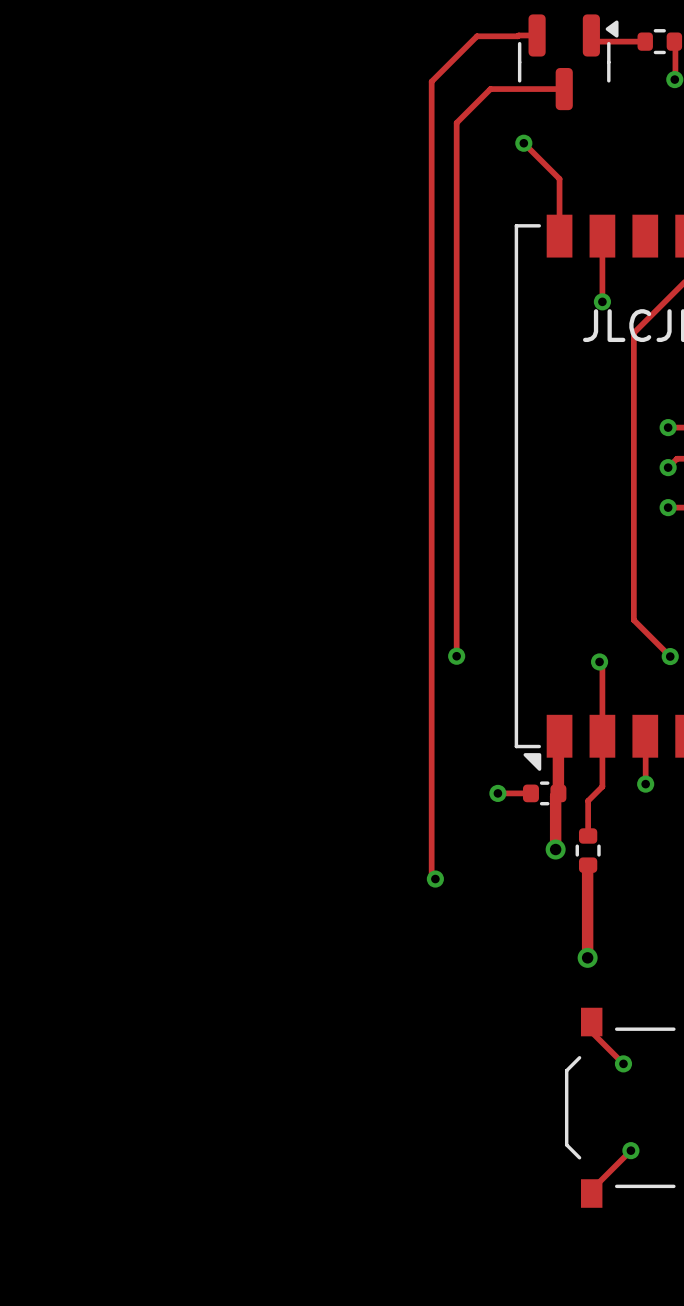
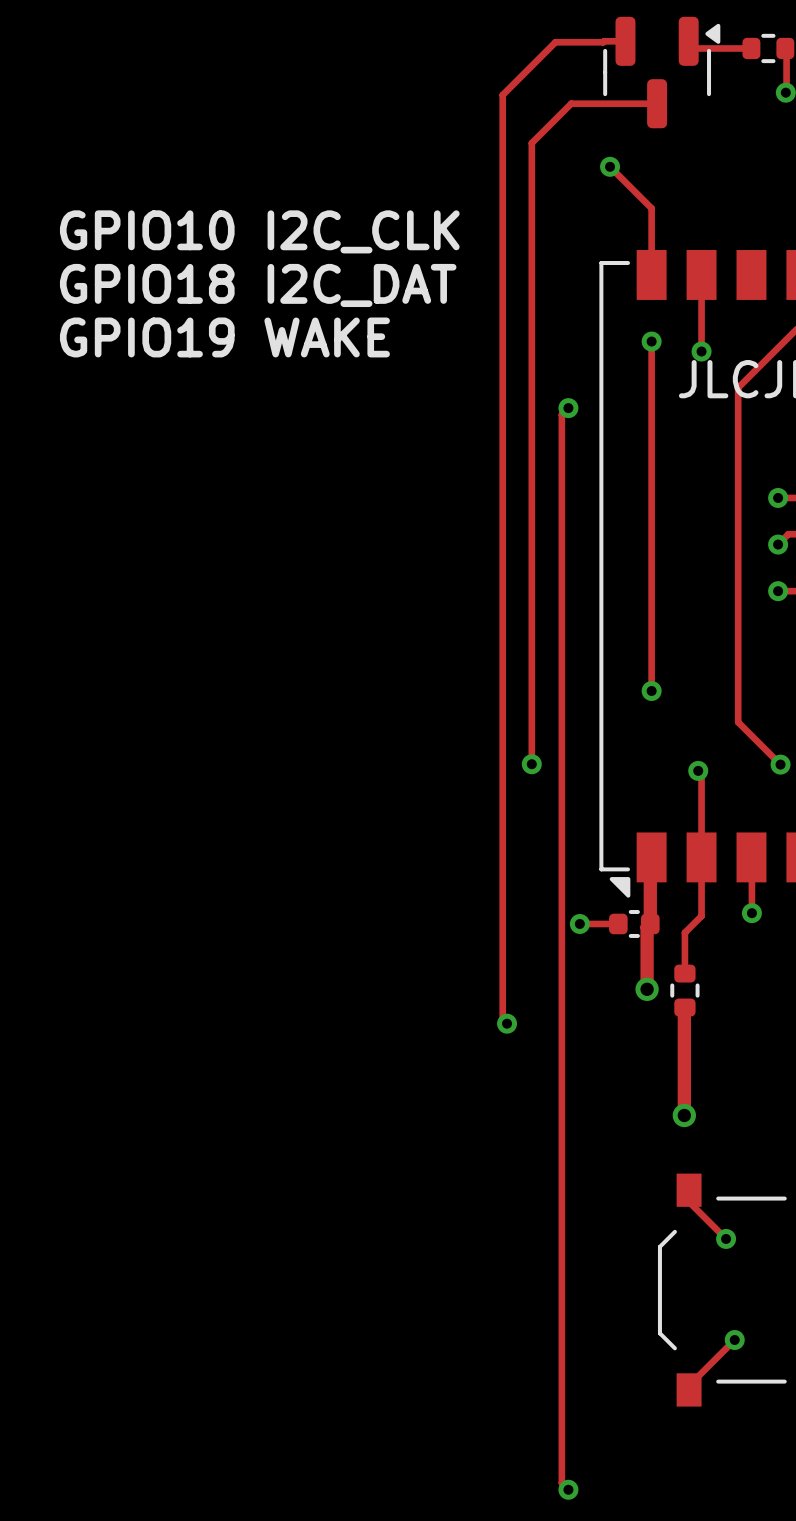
text: none -> GPIO10 I2C_CLK (259, 231)
text: none -> GPIO18 I2C_DAT (258, 285)
text: none -> GPIO19 WAKE (224, 337)
track: none -> (651, 341) (651, 691)
via: none -> (651, 341)
track: none -> (568, 408) (561, 414) (561, 1483) (568, 1489)
via: none -> (568, 408)
via: none -> (651, 691)
via: none -> (568, 1489)

